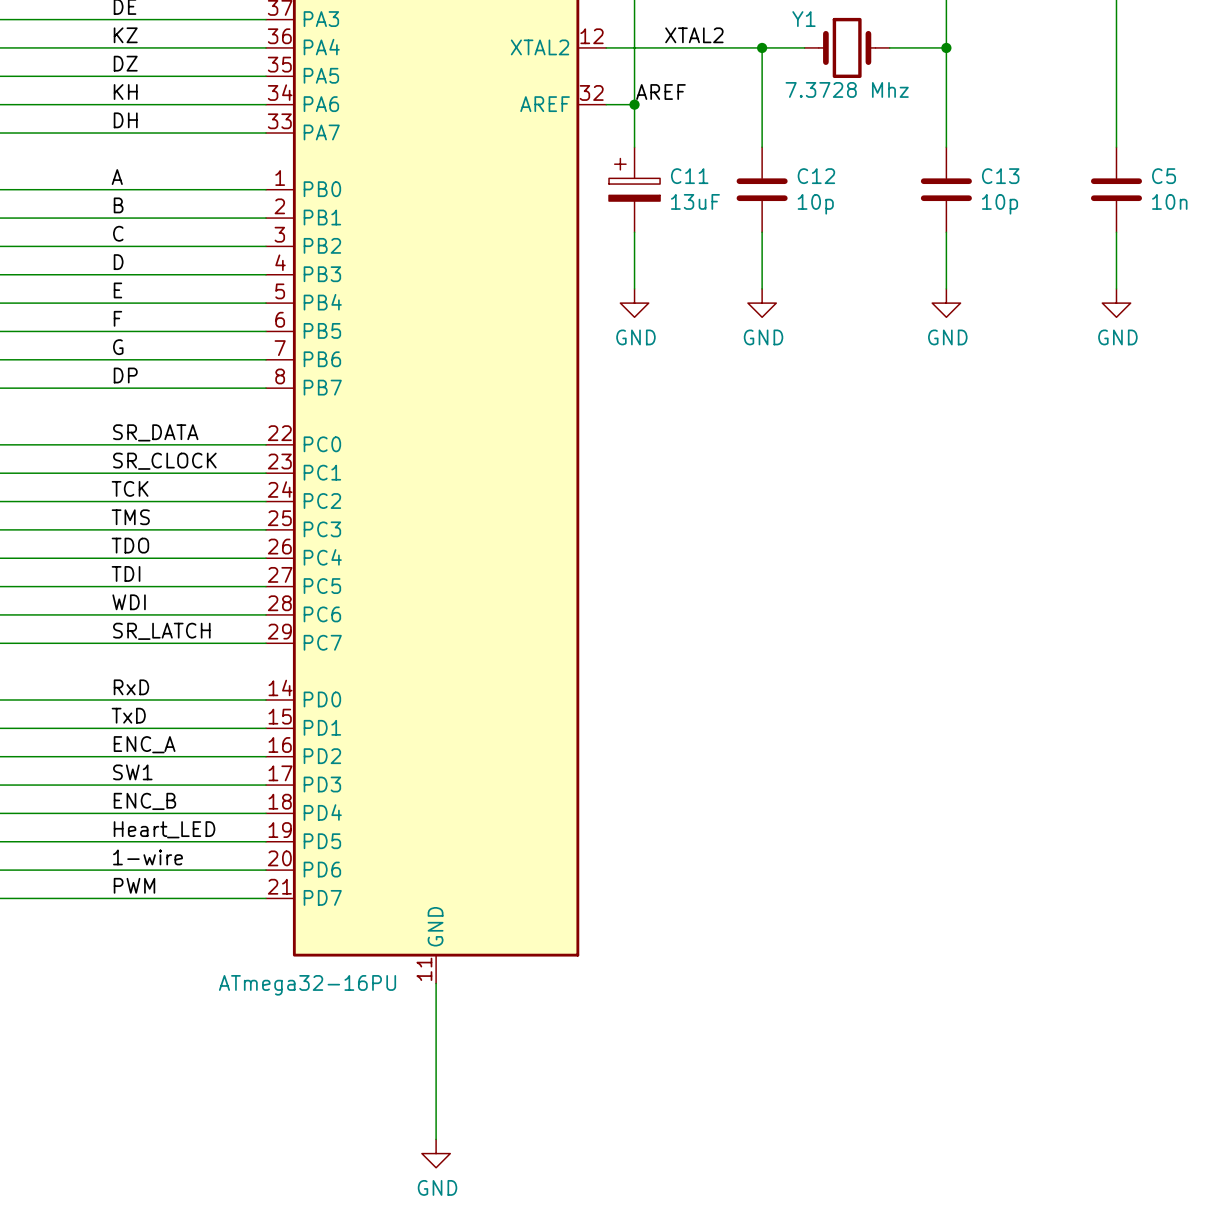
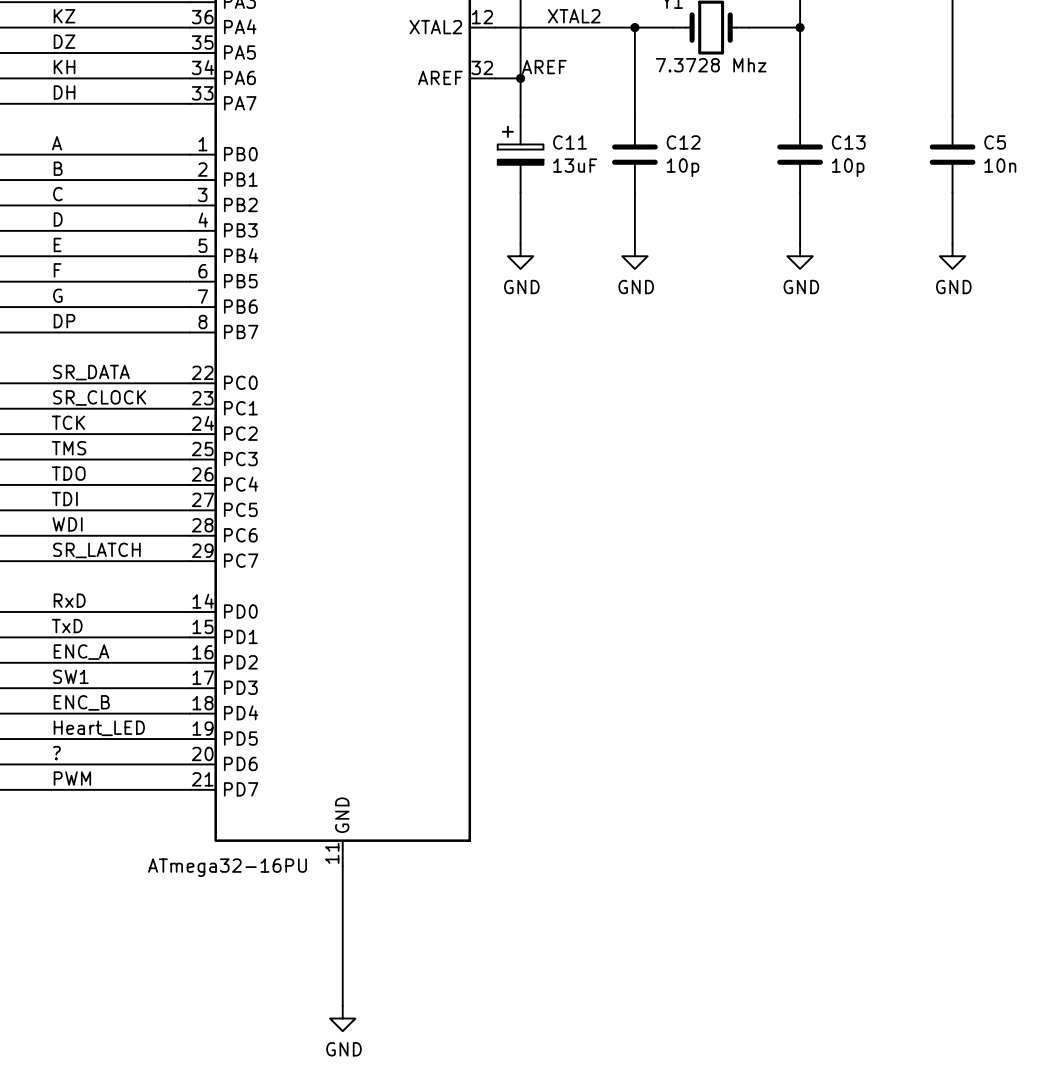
label: 1-wire (147, 857) -> ? (56, 753)

